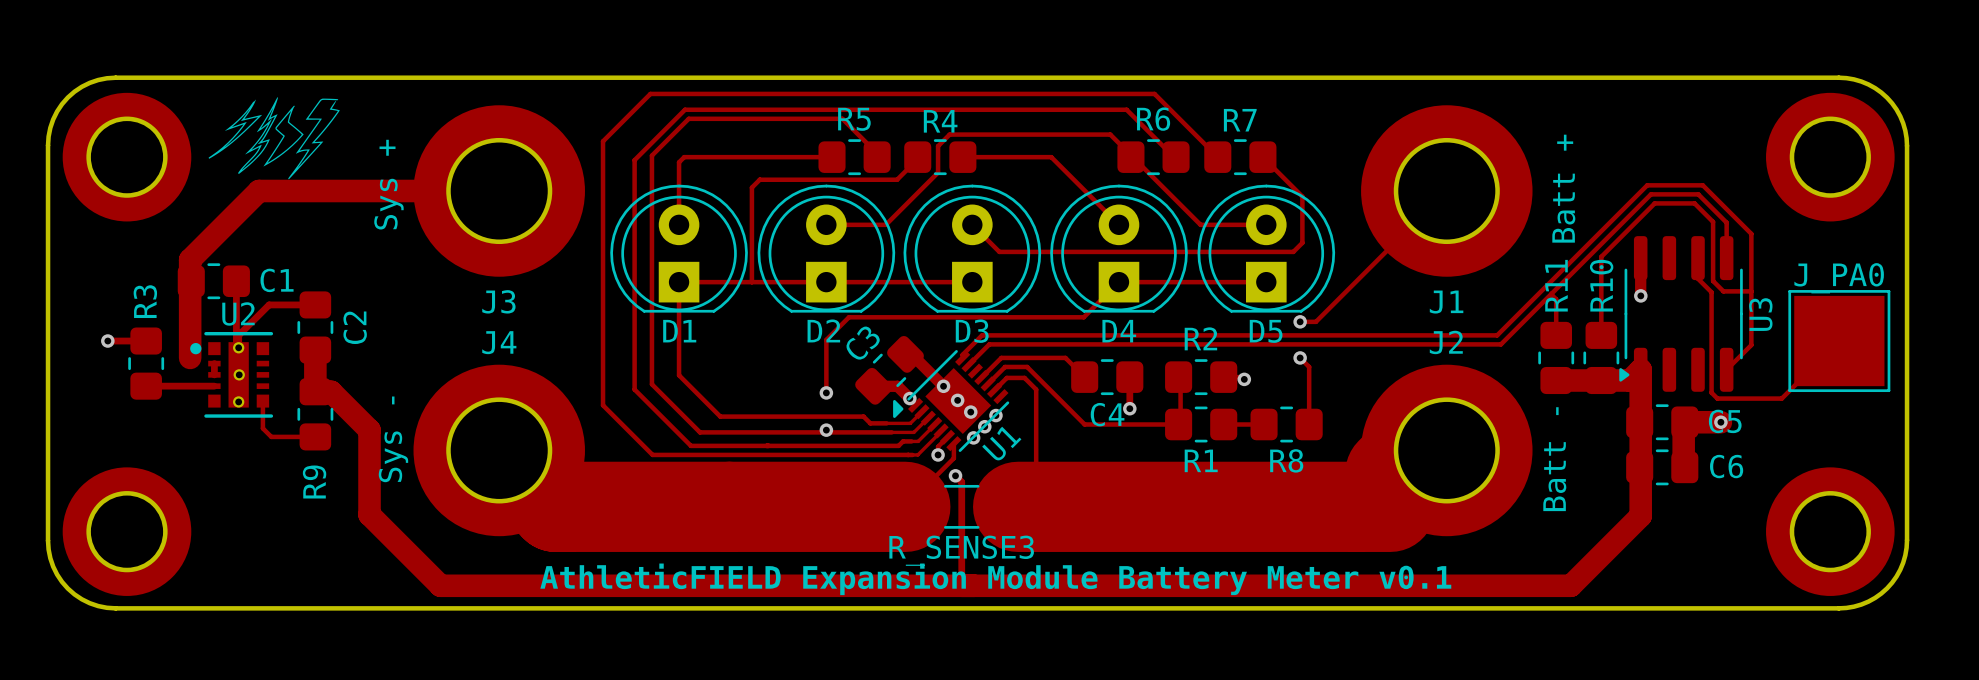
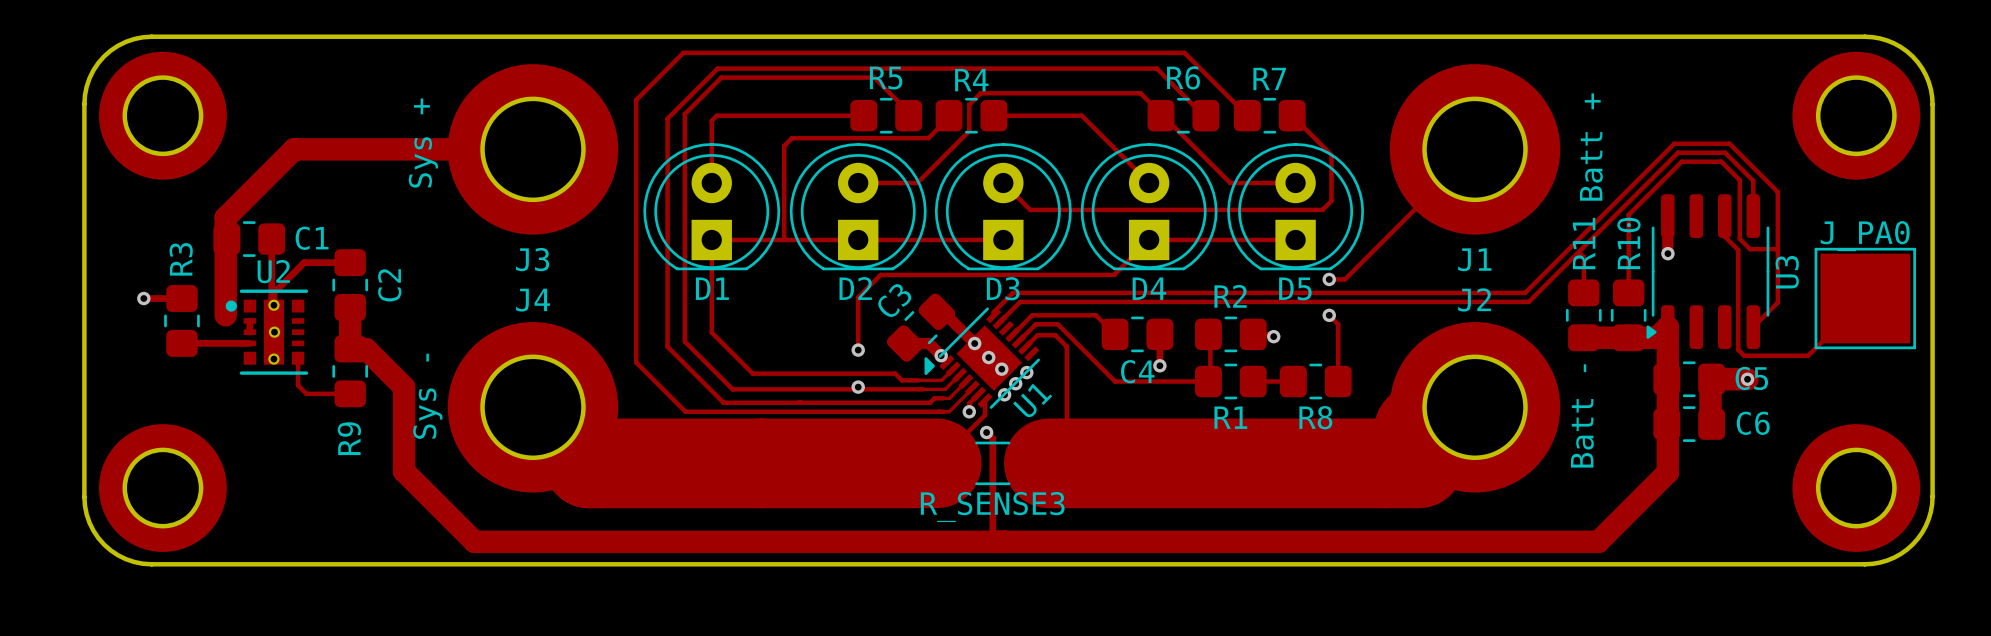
drawing: [208, 97, 340, 180] -> none
text: AthleticFIELD Expansion Module Battery Meter v0.1 (995, 579) -> none

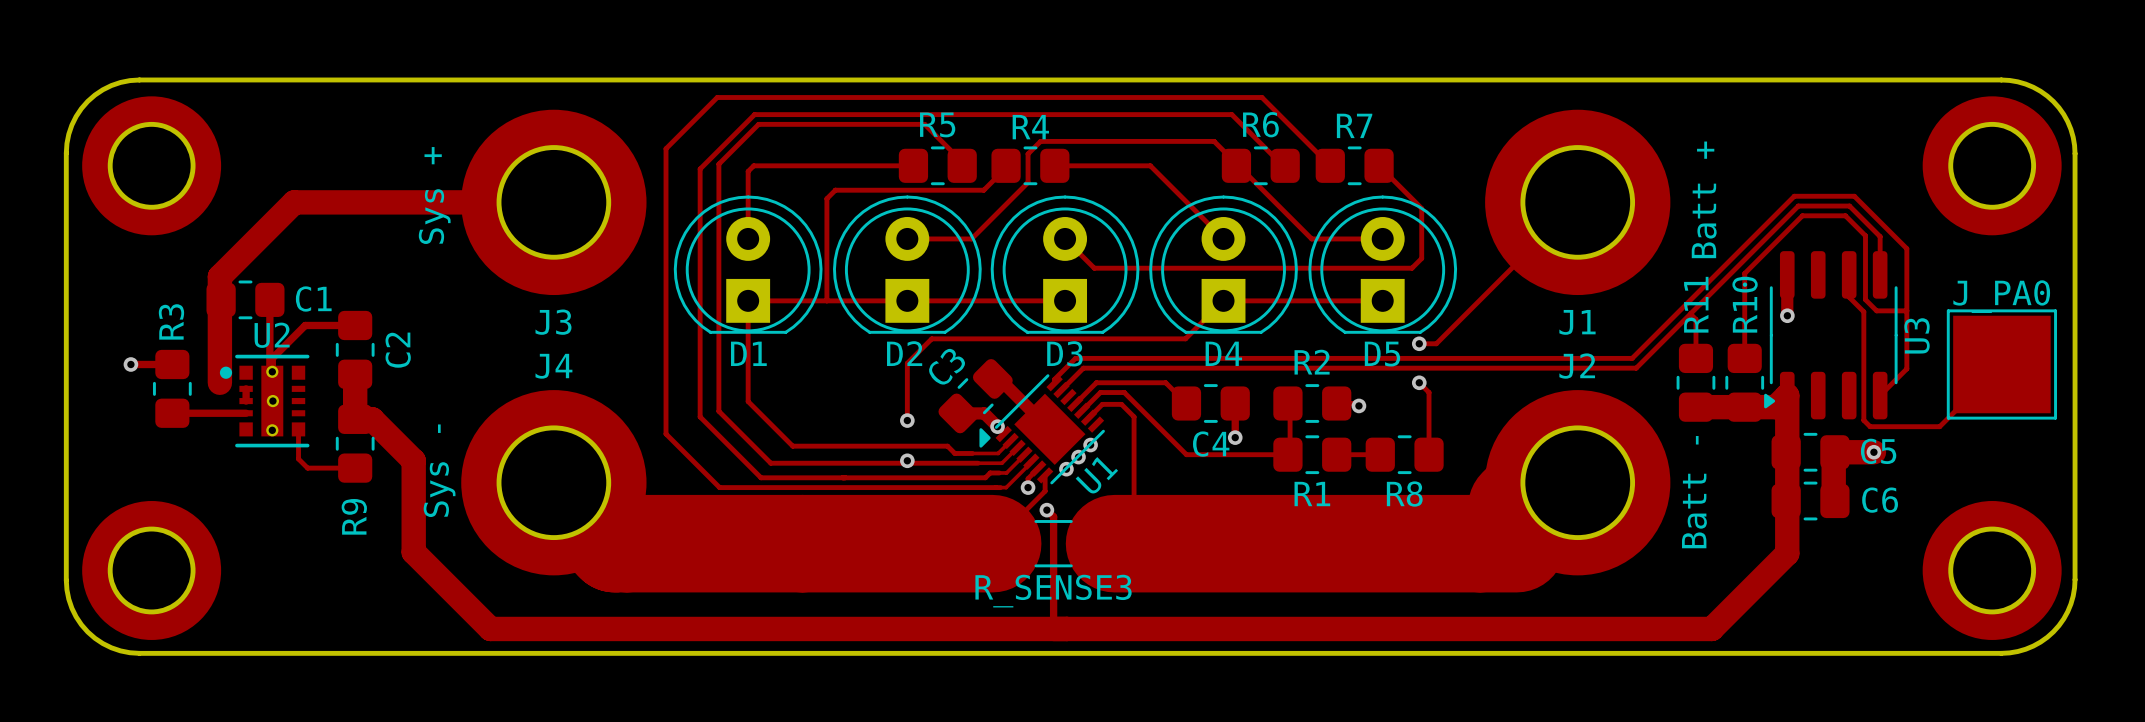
via: (974, 343) -> none
via: (988, 357) -> none
via: (1001, 369) -> none

